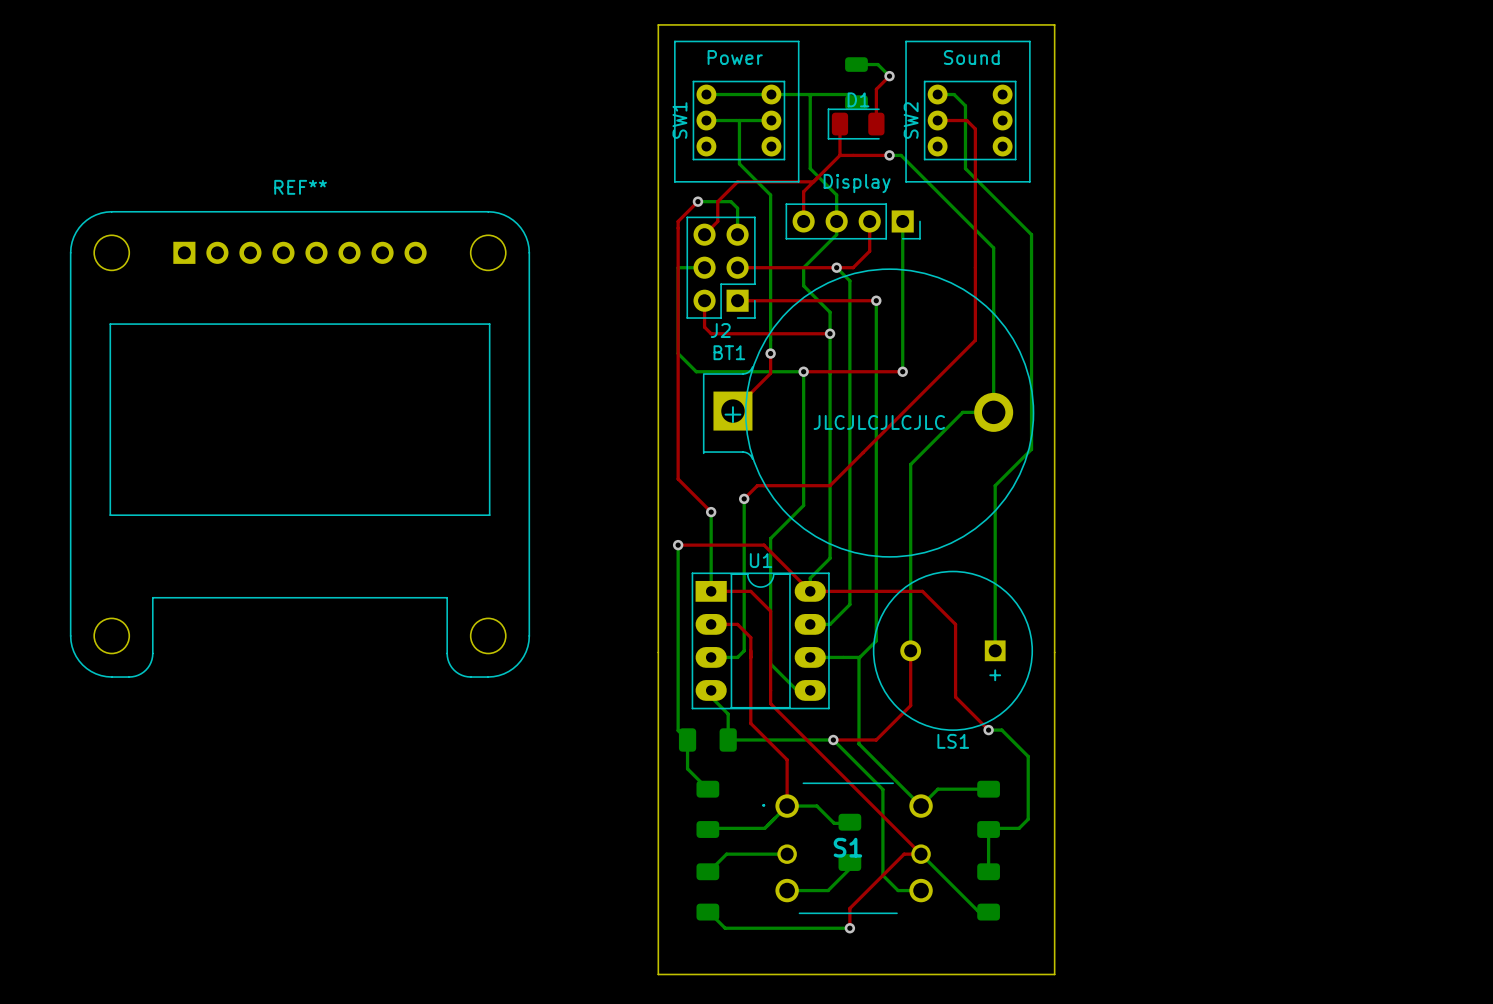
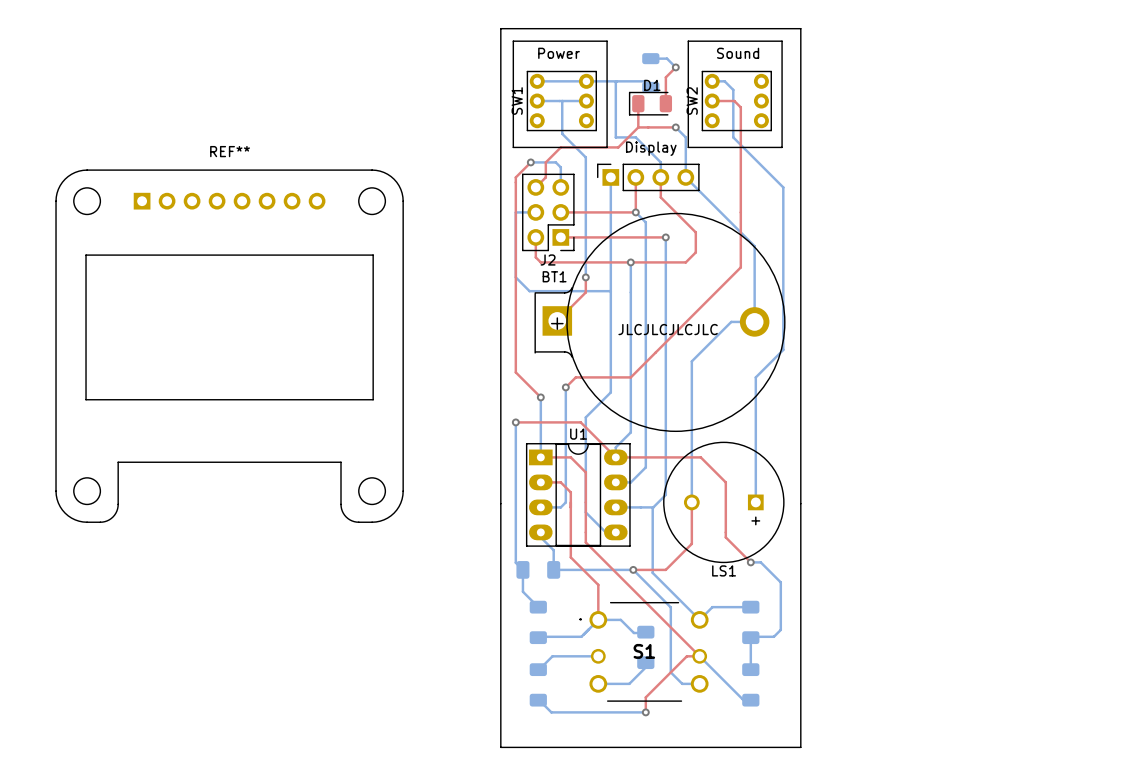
bottom track: (889, 155) (901, 155) (993, 248) (993, 312) -> (675, 127) (685, 137) (685, 177) (754, 246)
bottom track: (810, 168) (836, 195) (836, 234) (803, 267) -> (610, 177) (610, 212)
bottom track: none -> (615, 137) (635, 137) (660, 162) (660, 177)
top track: (813, 181) (803, 191) (803, 221) -> none
part rotation: 0° (853, 221) -> 180° (648, 177)
bottom track: (902, 221) (902, 371) -> none
top track: (869, 247) (869, 251) (853, 267) (836, 267) -> (635, 177) (635, 212)
top track: none -> (660, 197) (695, 232) (695, 252) (685, 262) (630, 262)
bottom track: (803, 285) (830, 312) (830, 333) -> (610, 226) (610, 291)
top track: (803, 371) (902, 371) -> none
via: (803, 371) -> none
via: (902, 371) -> none

